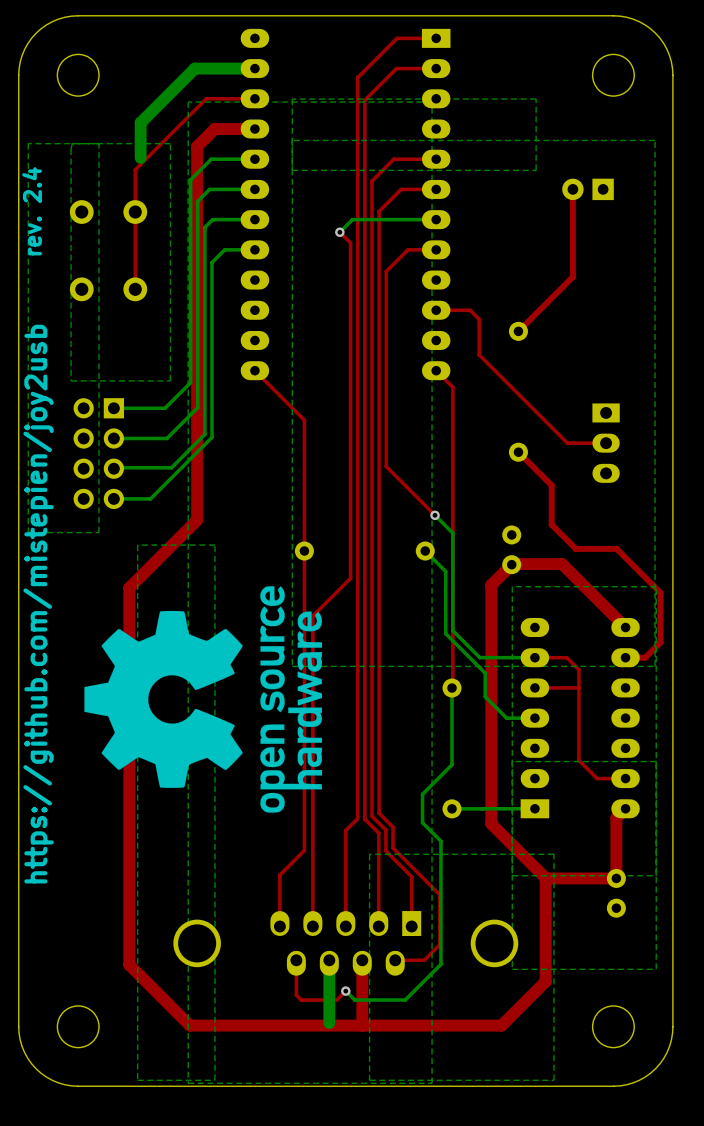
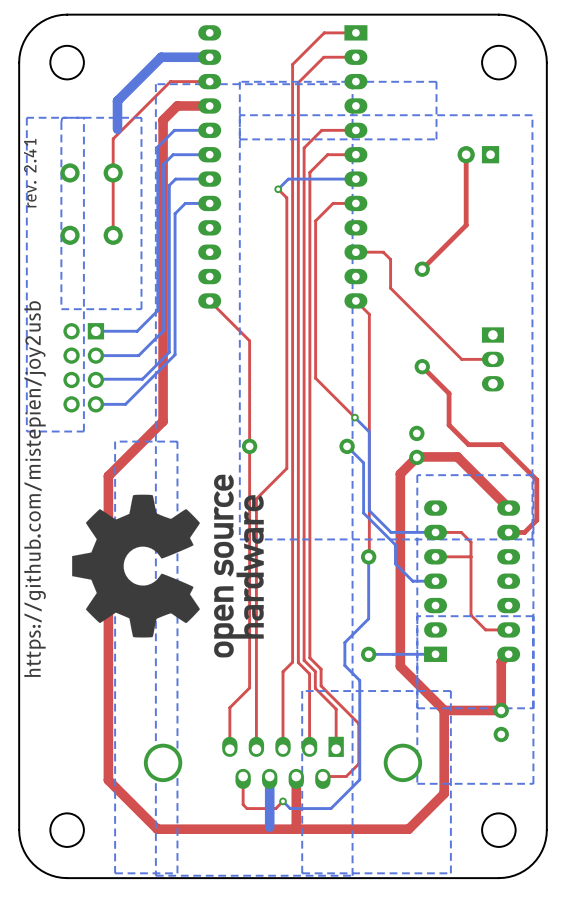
text: rev. 2.4 (32, 211) -> rev. 2.41 (30, 173)

